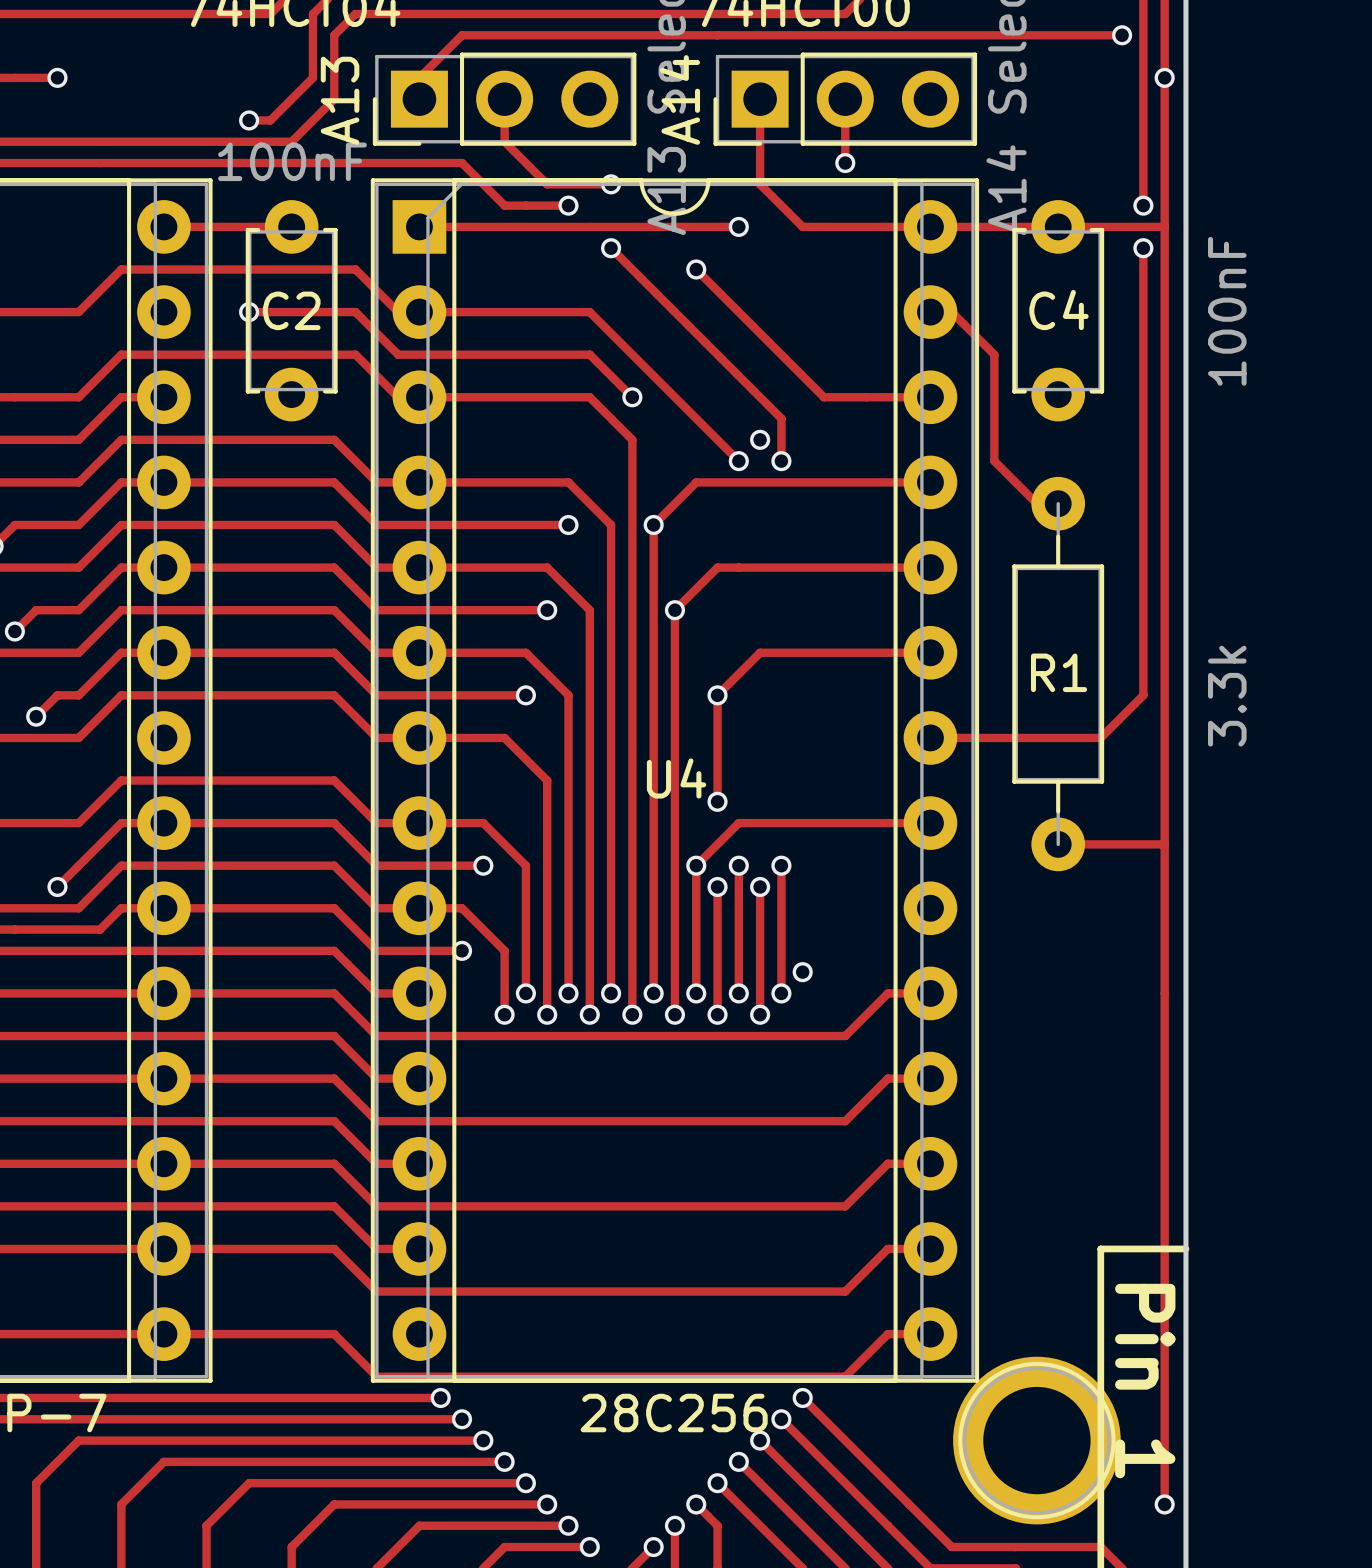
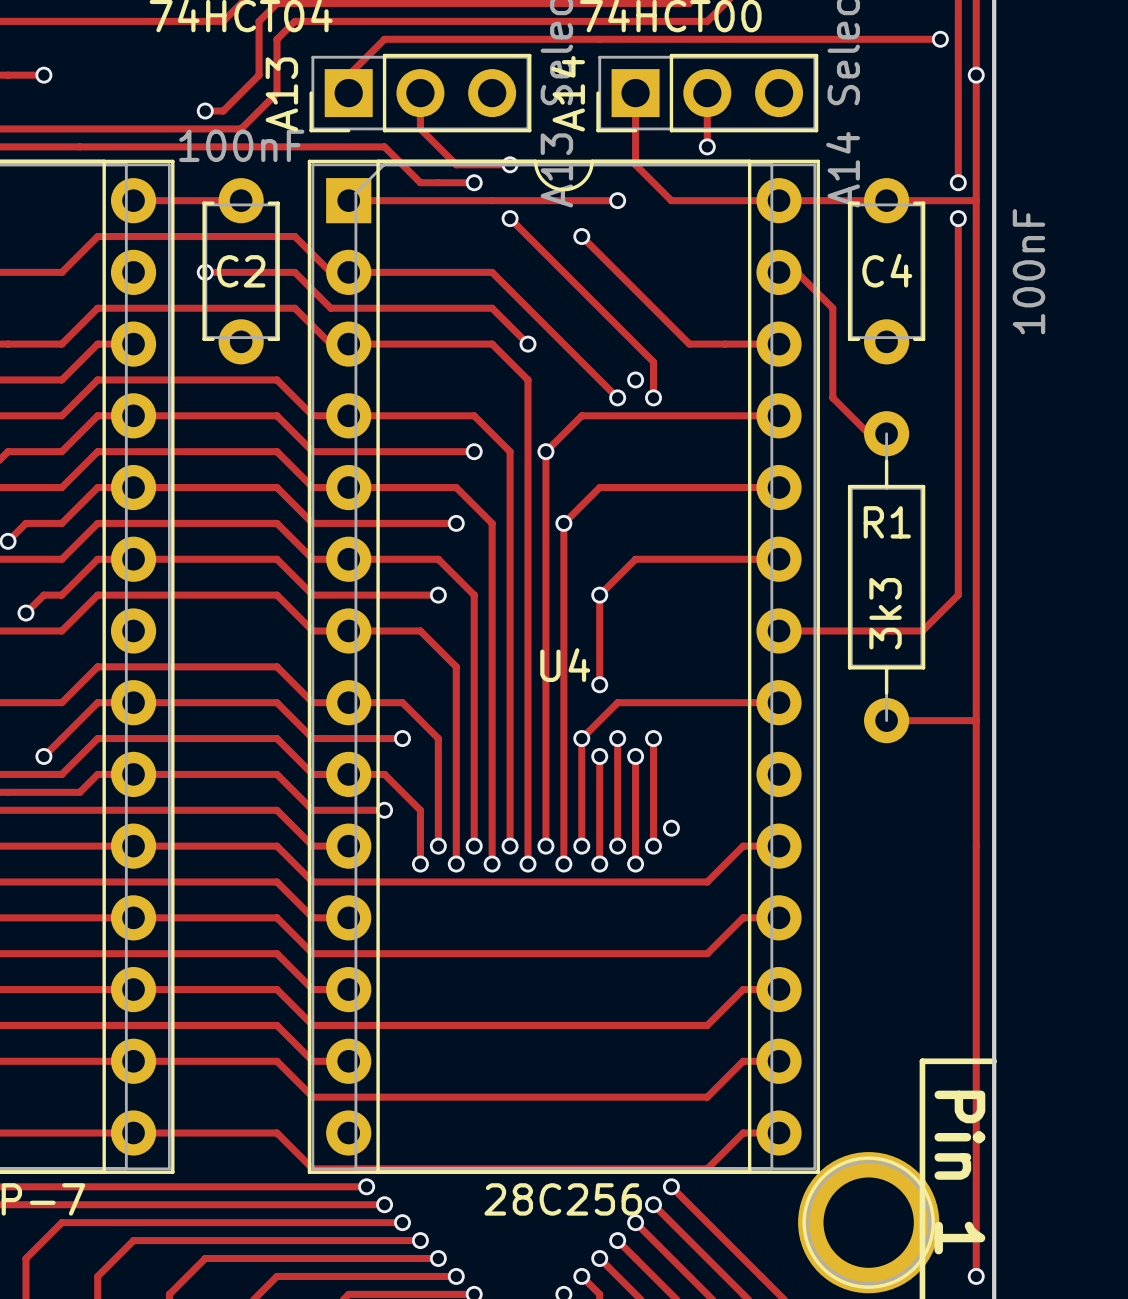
R1 name position: R1 (1059, 672) -> R1 (887, 522)
R1 value: 3.3k (1227, 696) -> 3k3 (885, 613)

